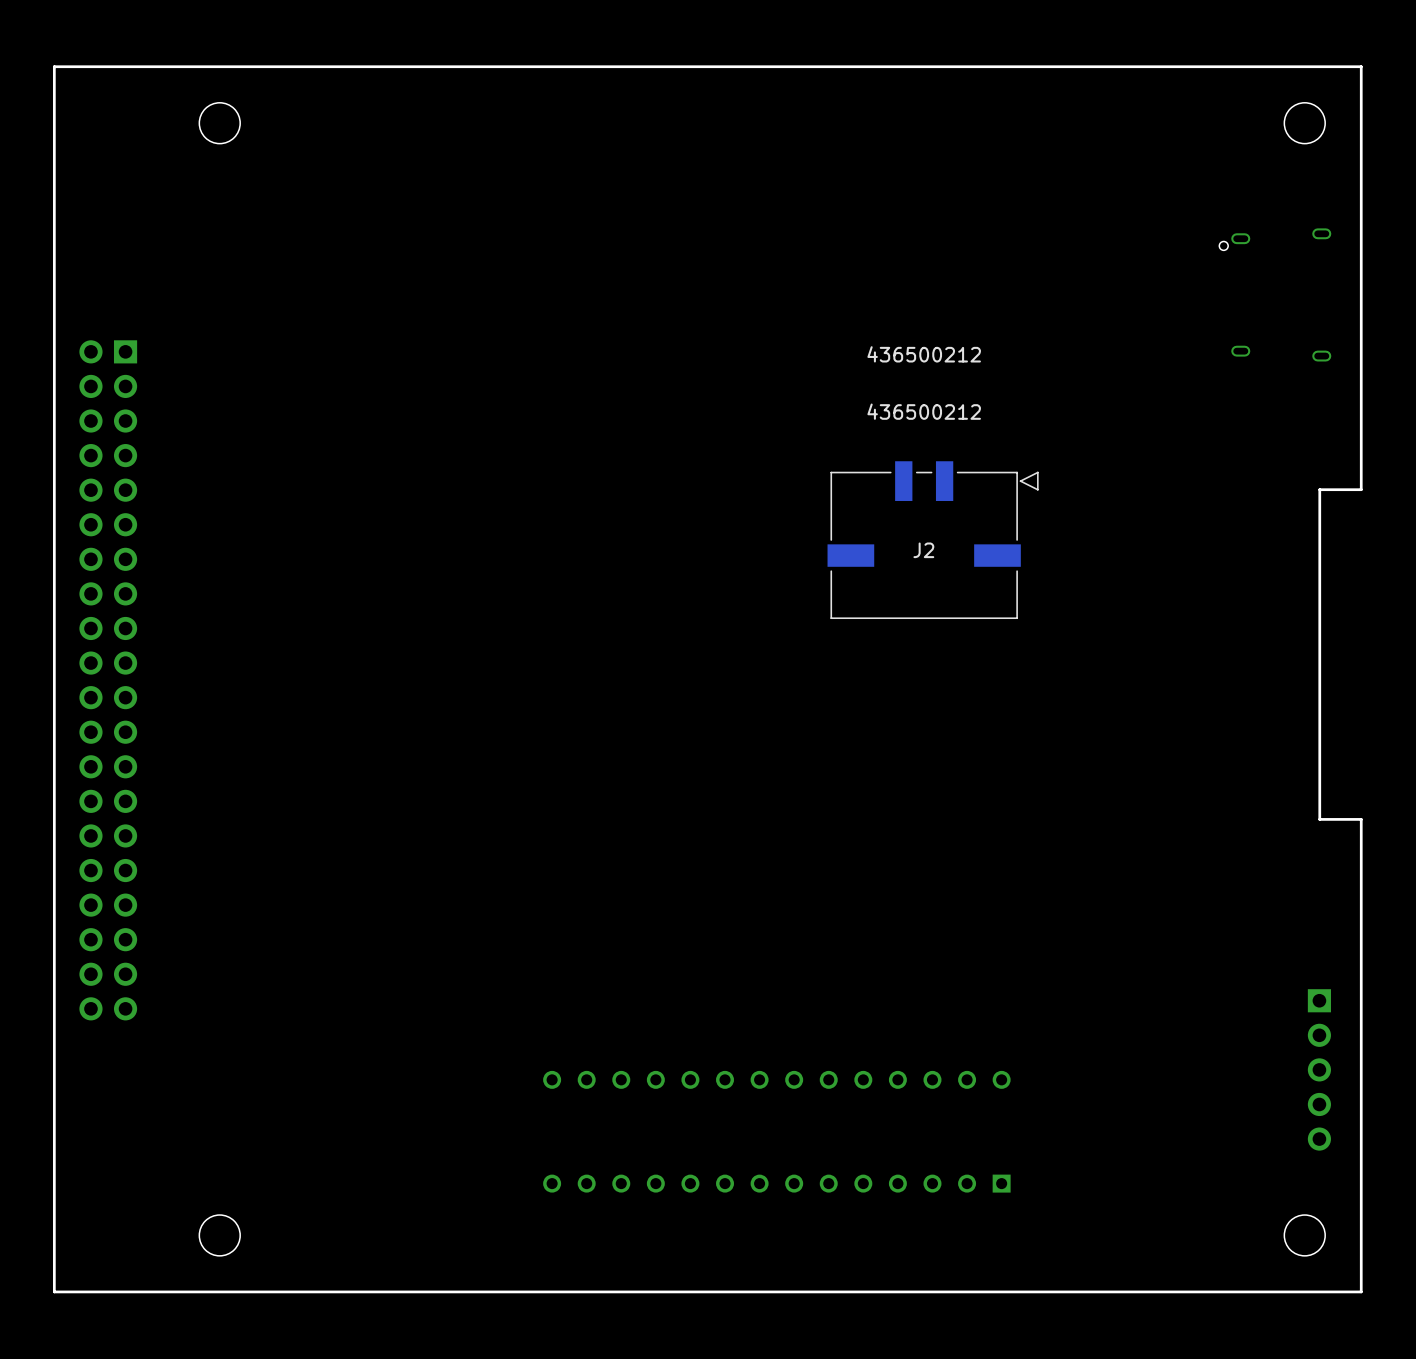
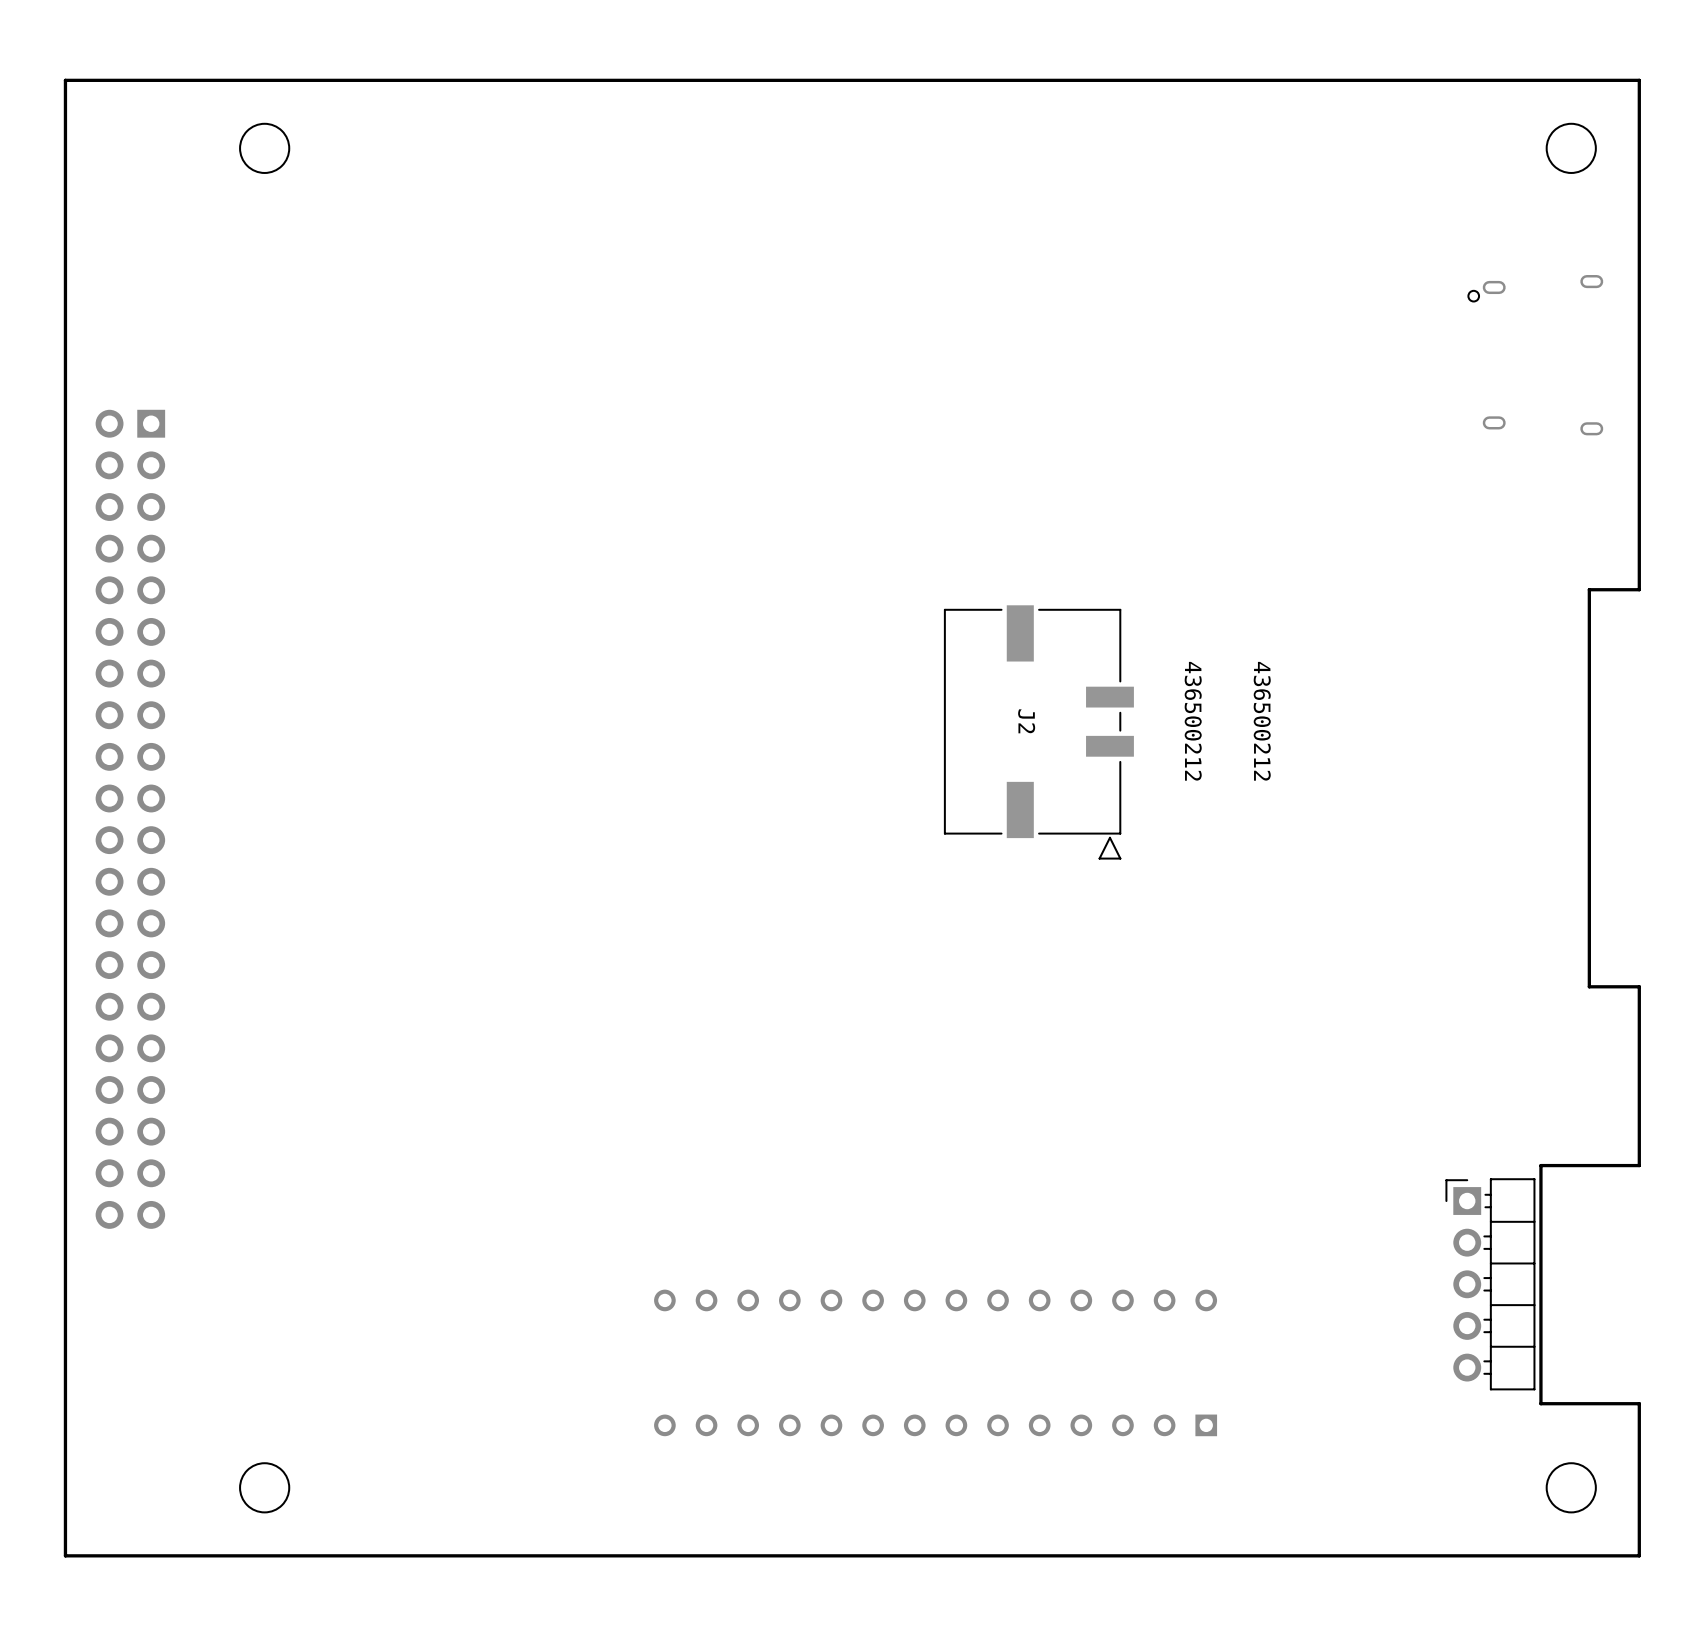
J2 rotation: 0° (933, 540) -> 90° clockwise (1038, 732)
board edge: (1361, 967) (1361, 1165) -> (1639, 1165) (1540, 1165) (1540, 1403) (1639, 1403)
part side: top (1319, 1069) -> bottom (1490, 1284)

